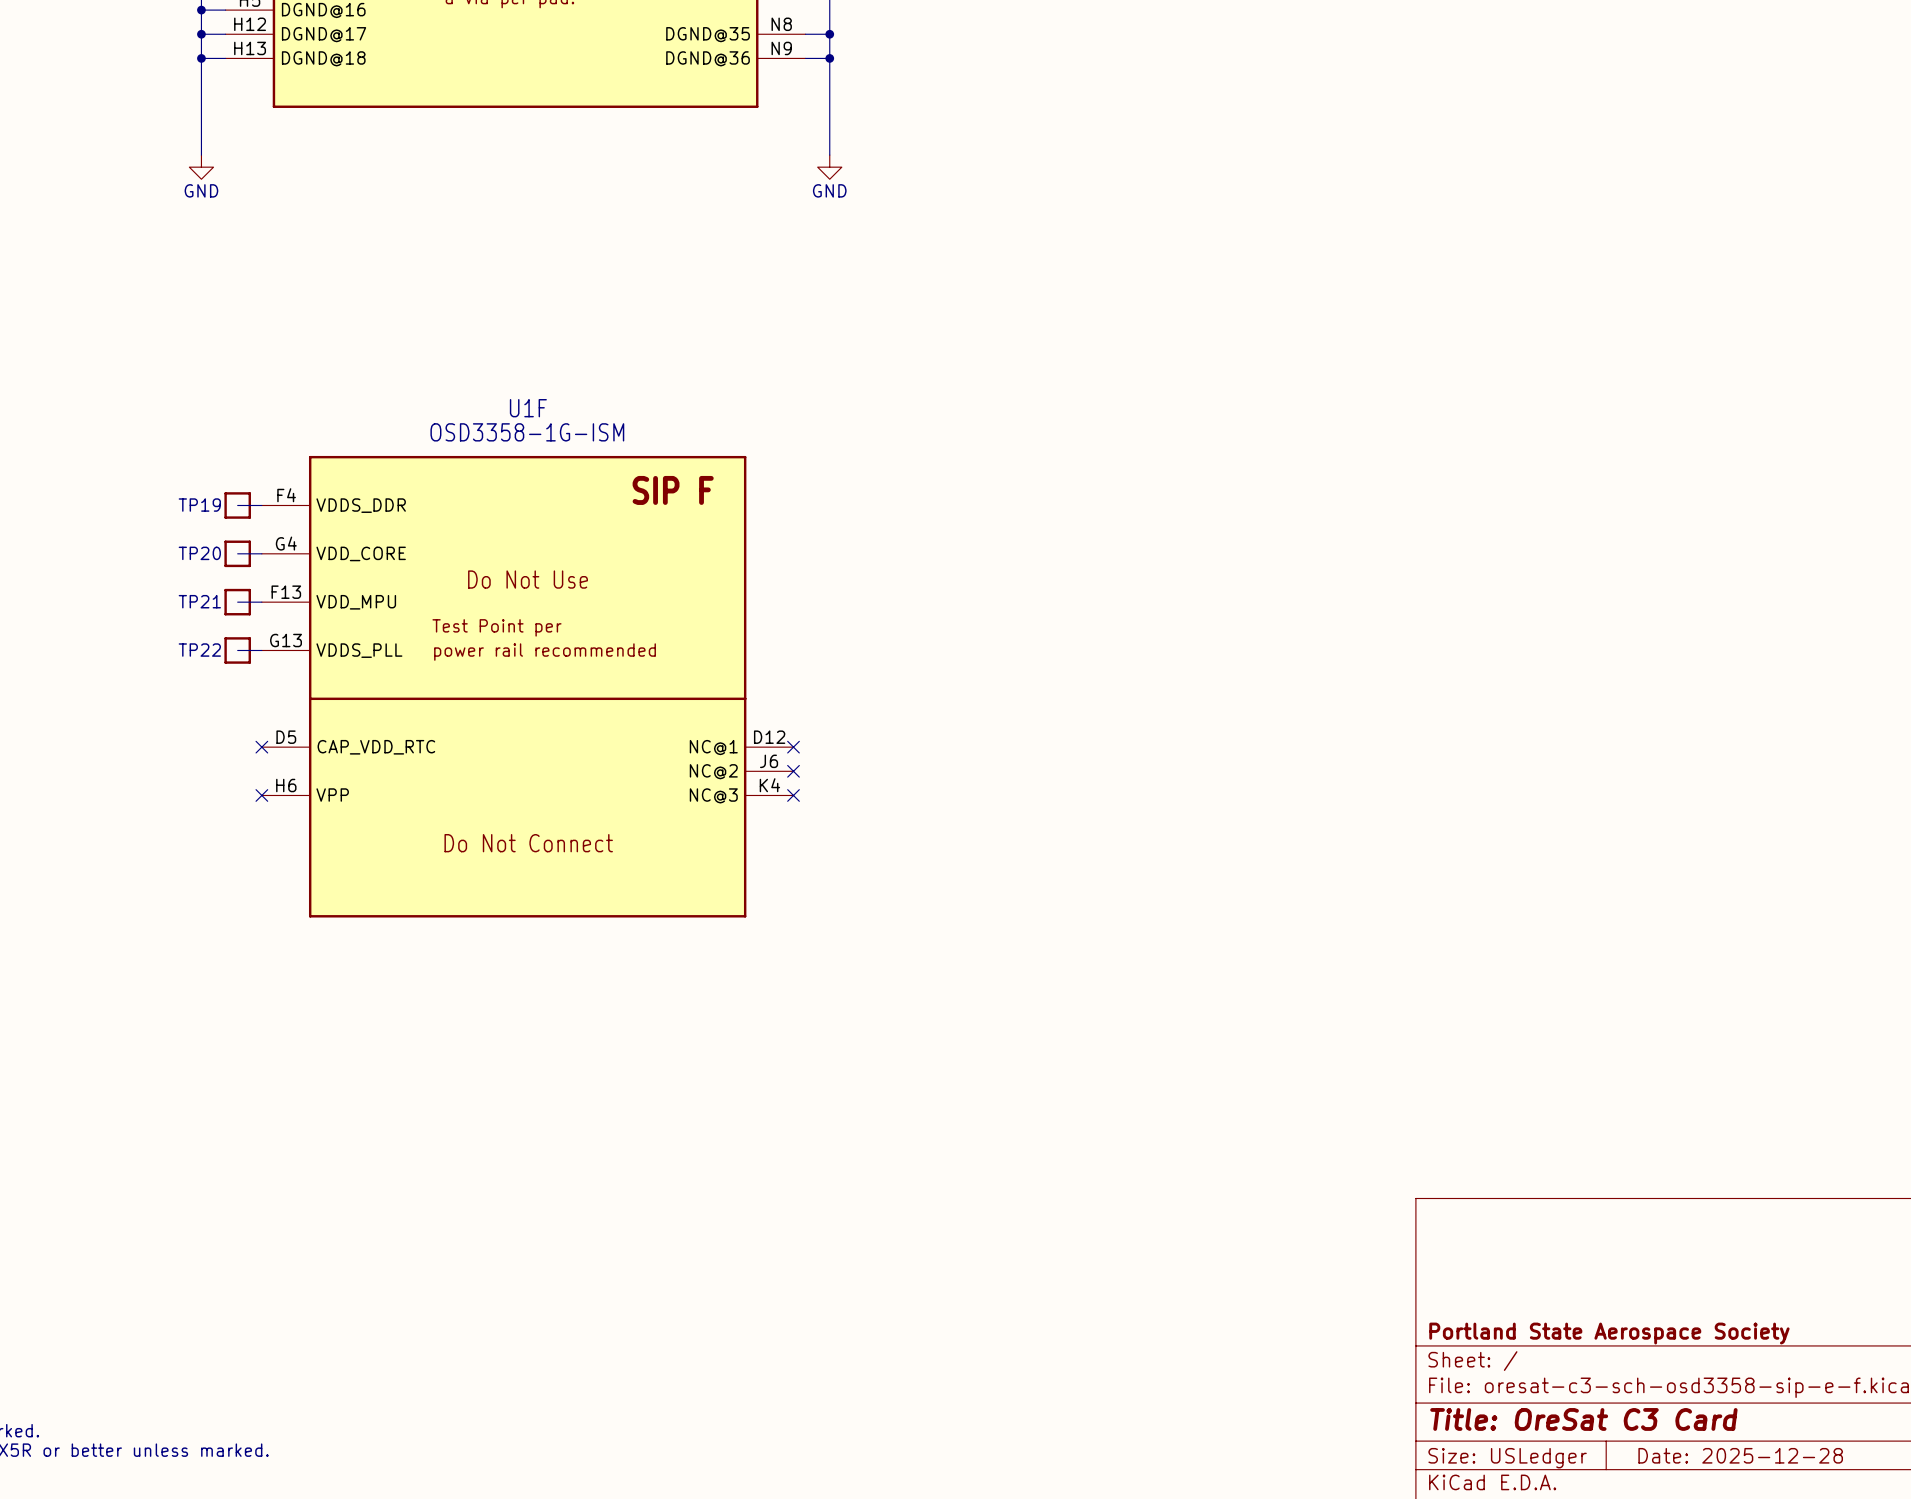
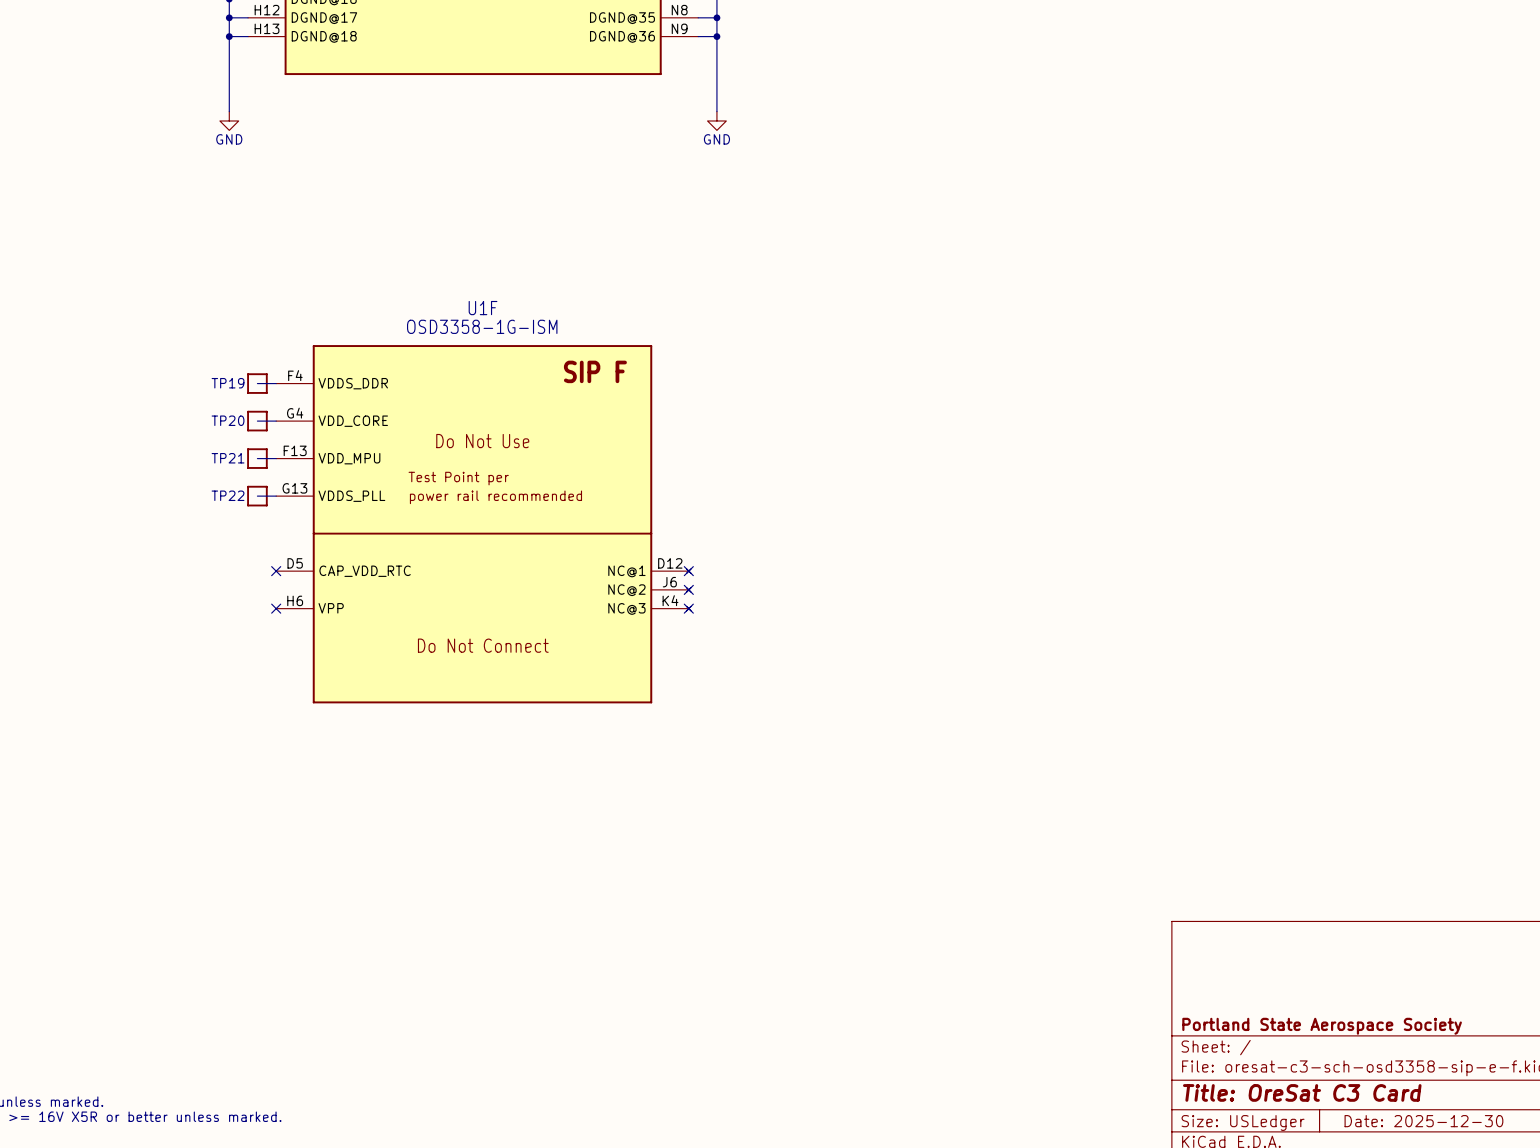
U1F symbol: [261, 455, 794, 918] -> [276, 345, 692, 704]
title block: Date: 2025-12-28 (1740, 1455) -> Date: 2025-12-30 (1423, 1121)

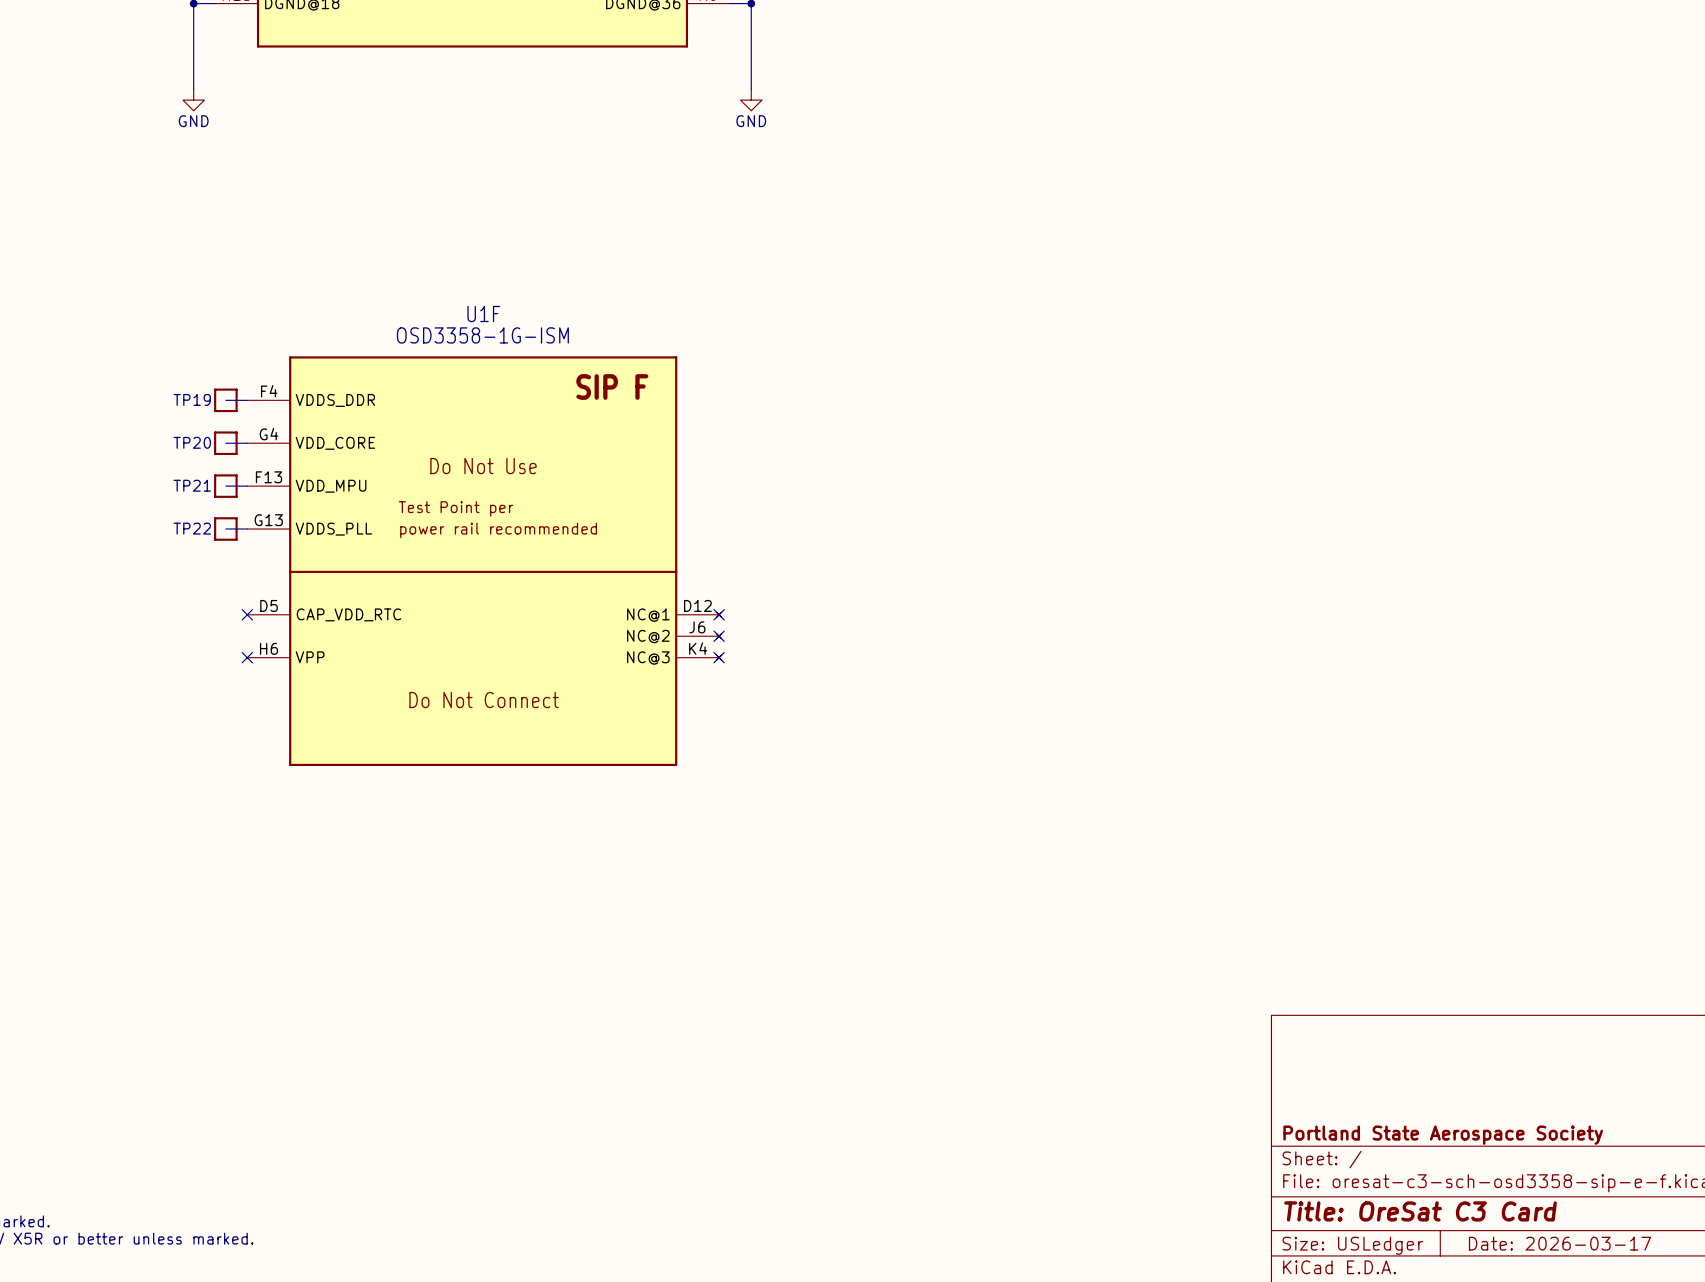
title block: Date: 2025-12-30 (1423, 1121) -> Date: 2026-03-17 (1559, 1243)

